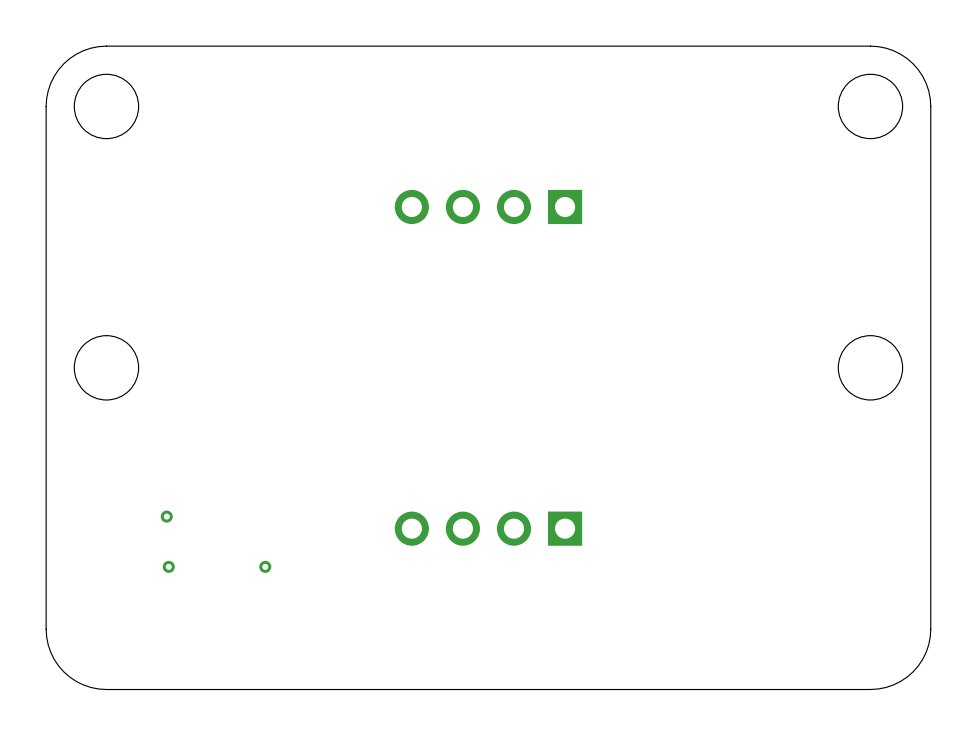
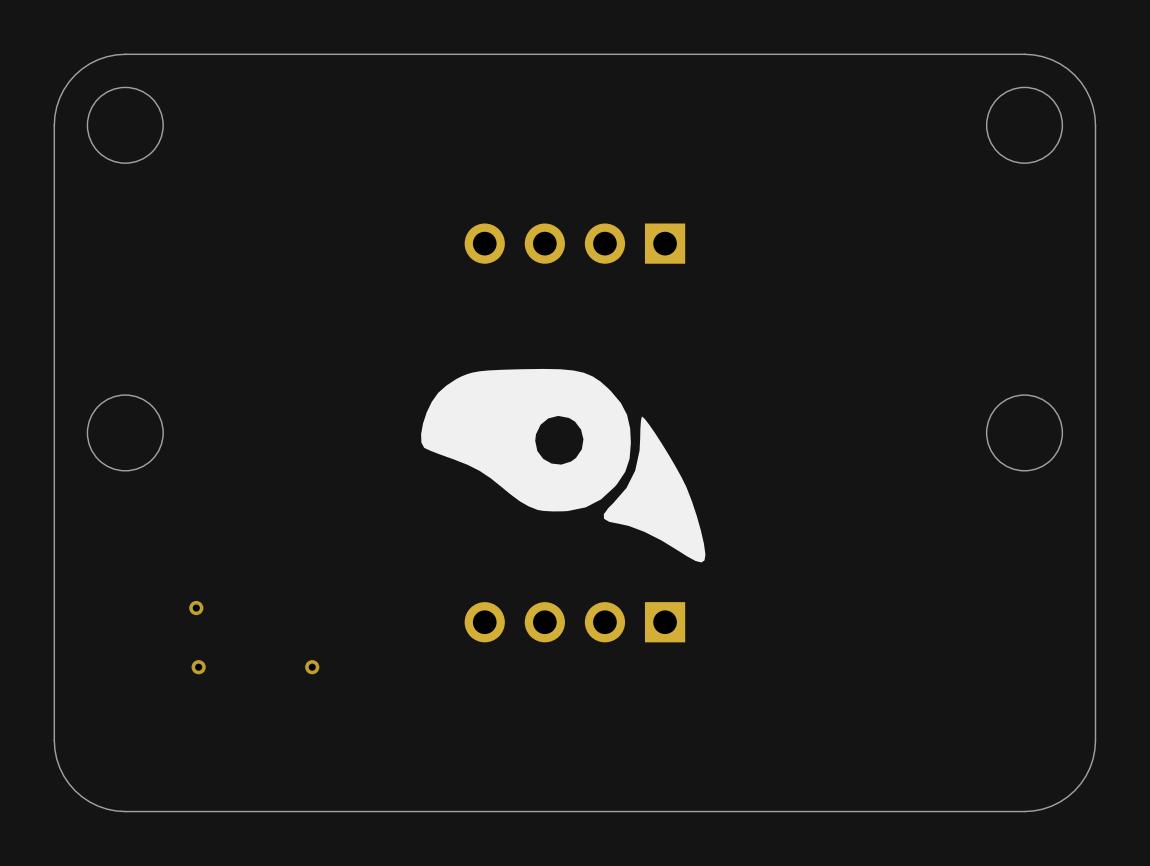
drawing: none -> [421, 368, 706, 563]

